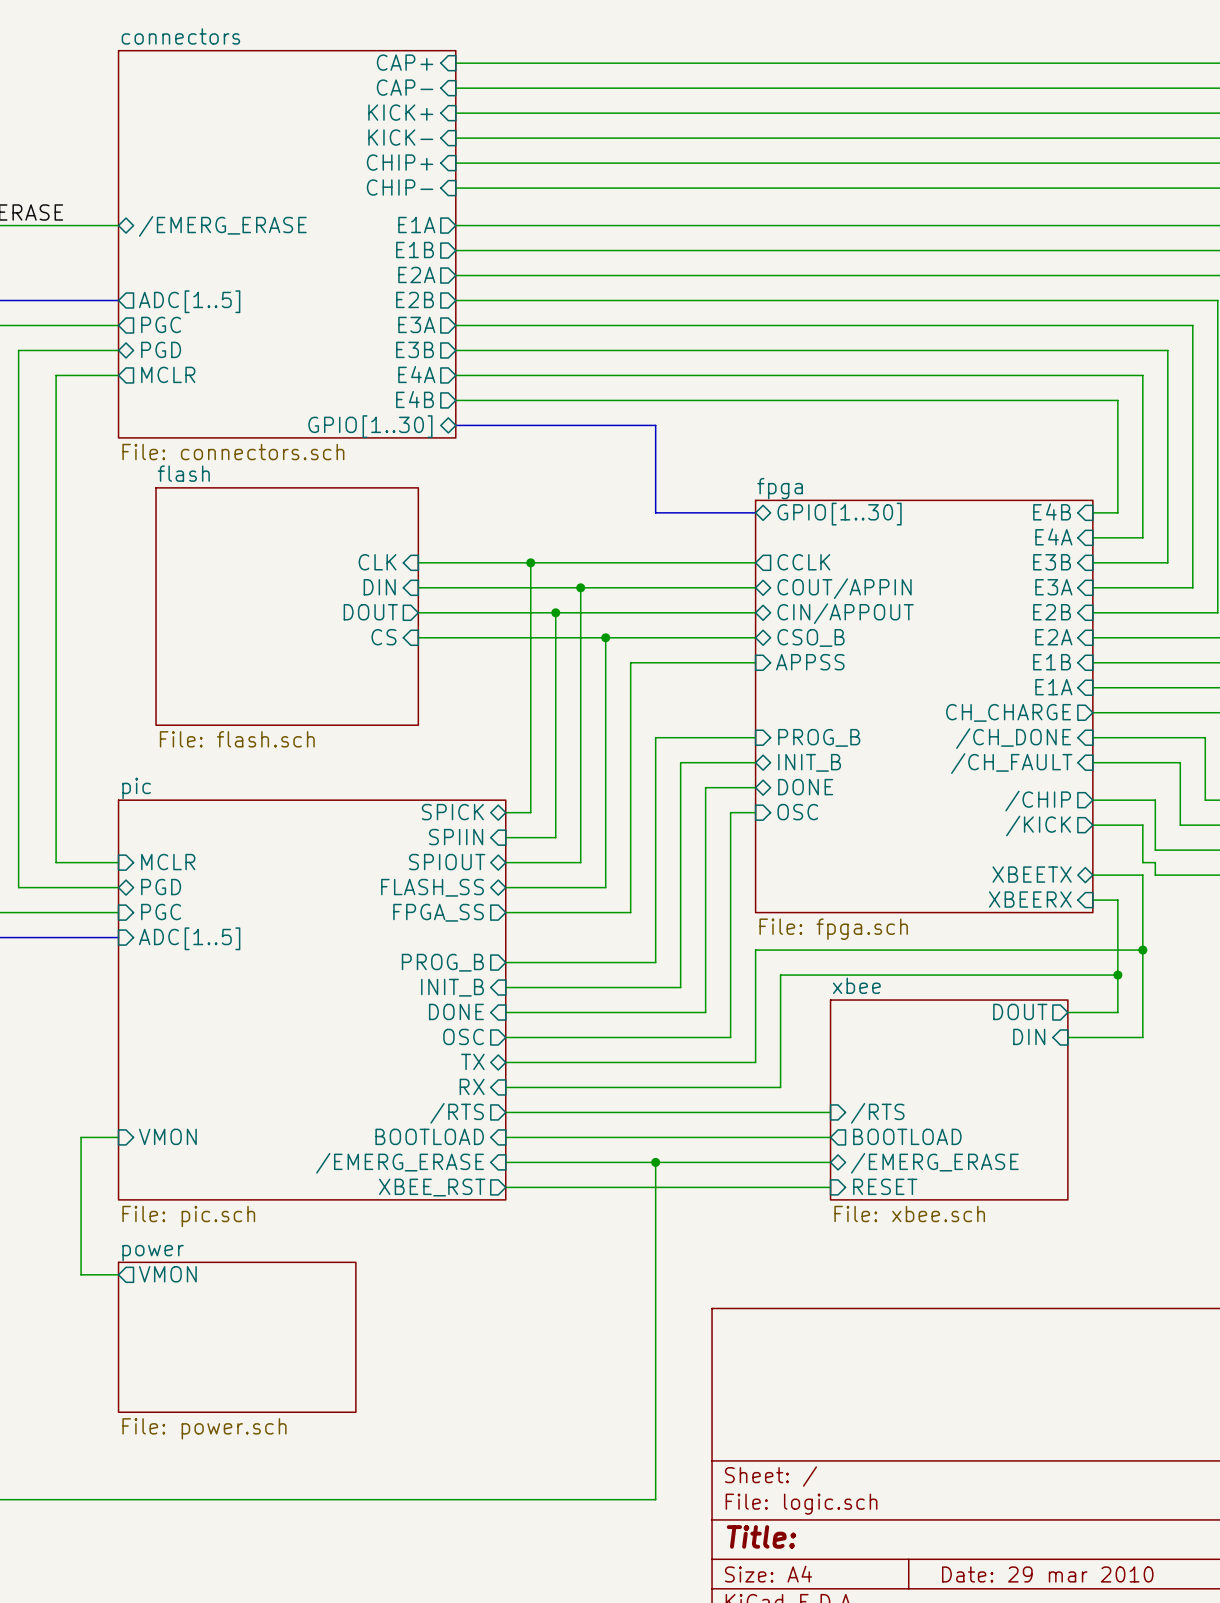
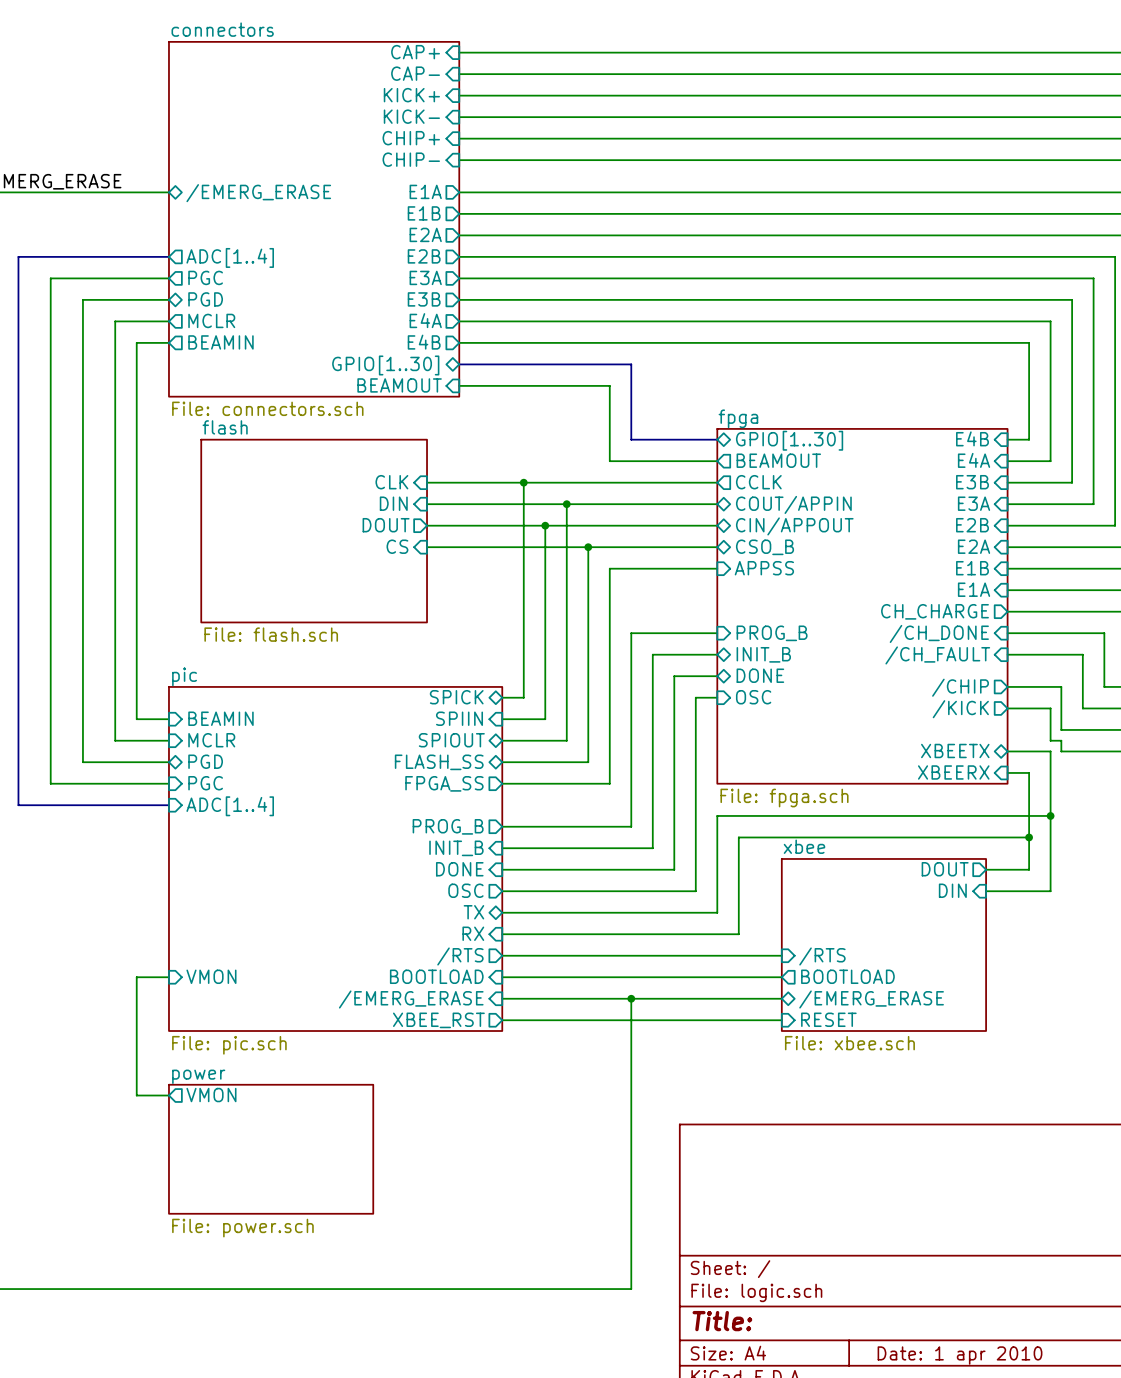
sheet connectors: File: connectors.sch (287, 244) -> none
sheet connectors: none -> File: connectors.sch (314, 219)
sheet pin: ADC[1..5] (189, 301) -> ADC[1..4] (230, 257)
sheet pin: none -> BEAMIN (220, 342)
wire: none -> (168, 342) (136, 342) (136, 719) (168, 719)
sheet pin: none -> BEAMOUT (399, 385)
wire: none -> (459, 385) (609, 385) (609, 461) (717, 461)
sheet pin: none -> BEAMOUT (778, 460)
sheet flash: File: flash.sch (287, 606) -> none
sheet flash: none -> File: flash.sch (314, 531)
sheet pin: none -> BEAMIN (220, 718)
sheet pin: ADC[1..5] (189, 938) -> ADC[1..4] (230, 806)
title block: Date: 29 mar 2010 (1047, 1574) -> Date: 1 apr 2010 (960, 1355)

